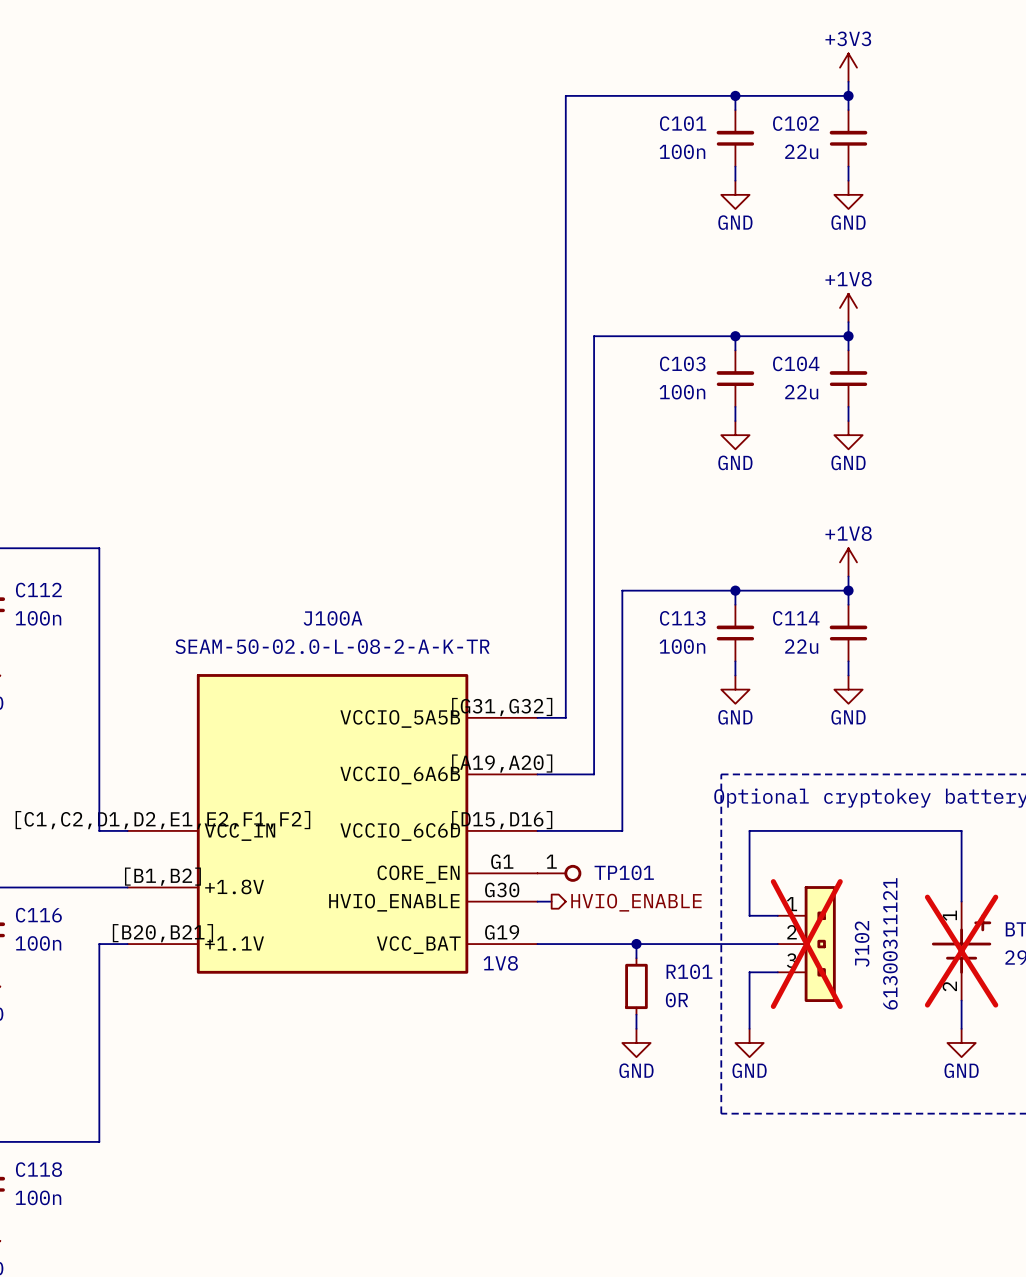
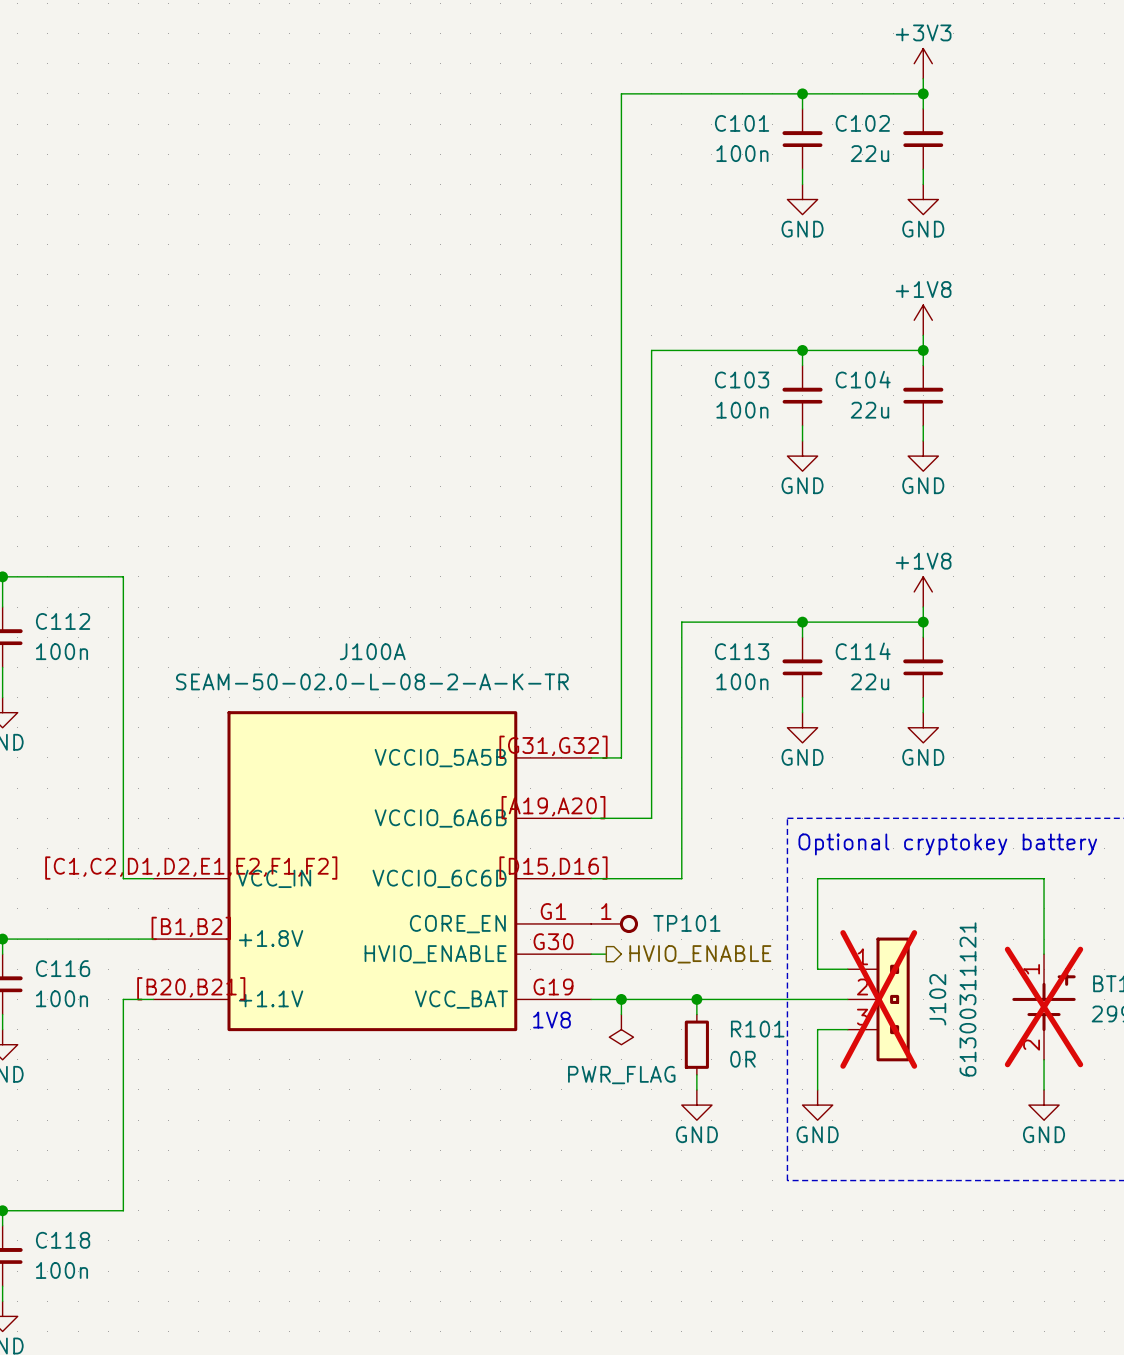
wire: none -> (621, 999) (621, 1014)
junction: none -> (621, 999)
power symbol: none -> PWR_FLAG (621, 1029)

